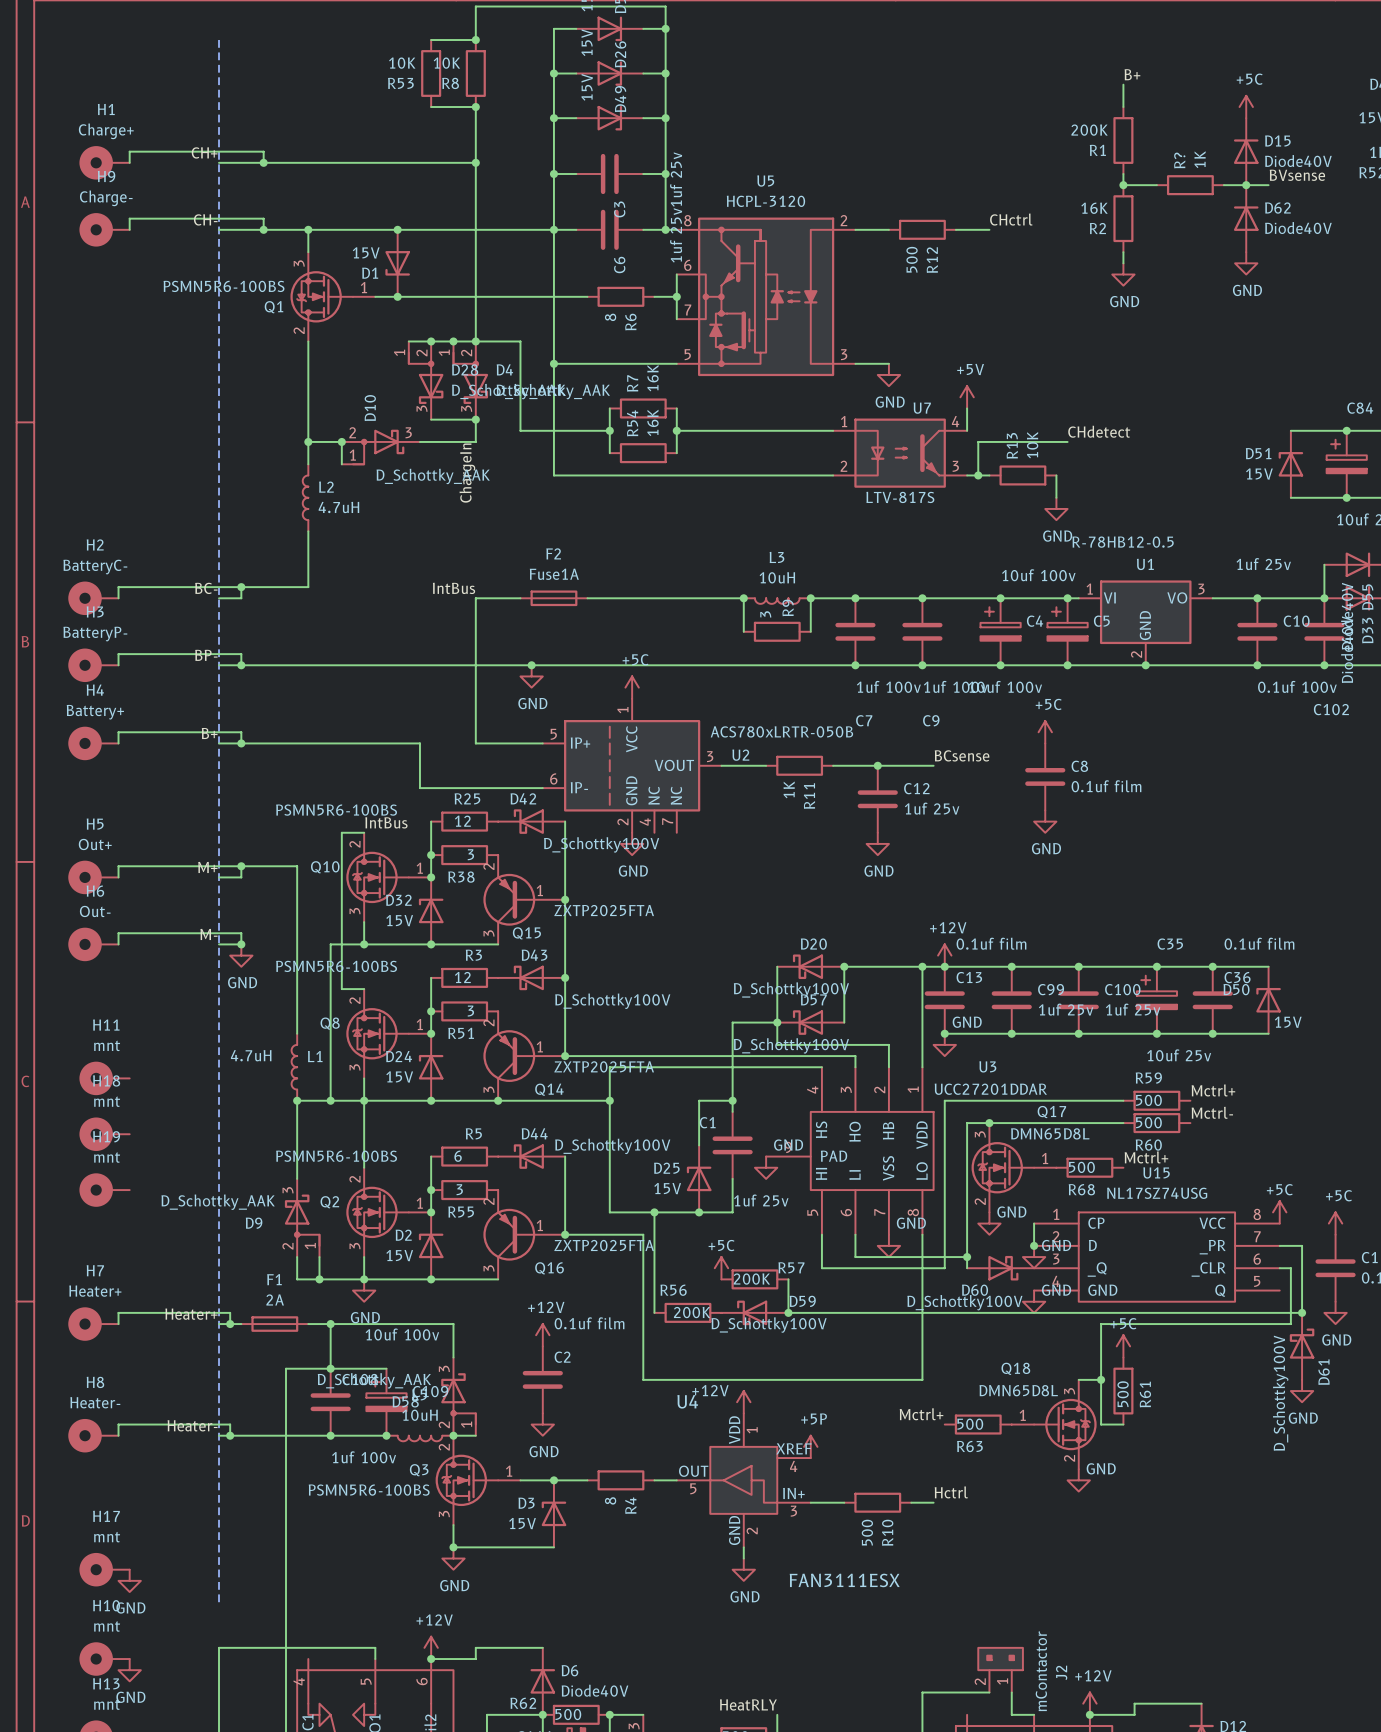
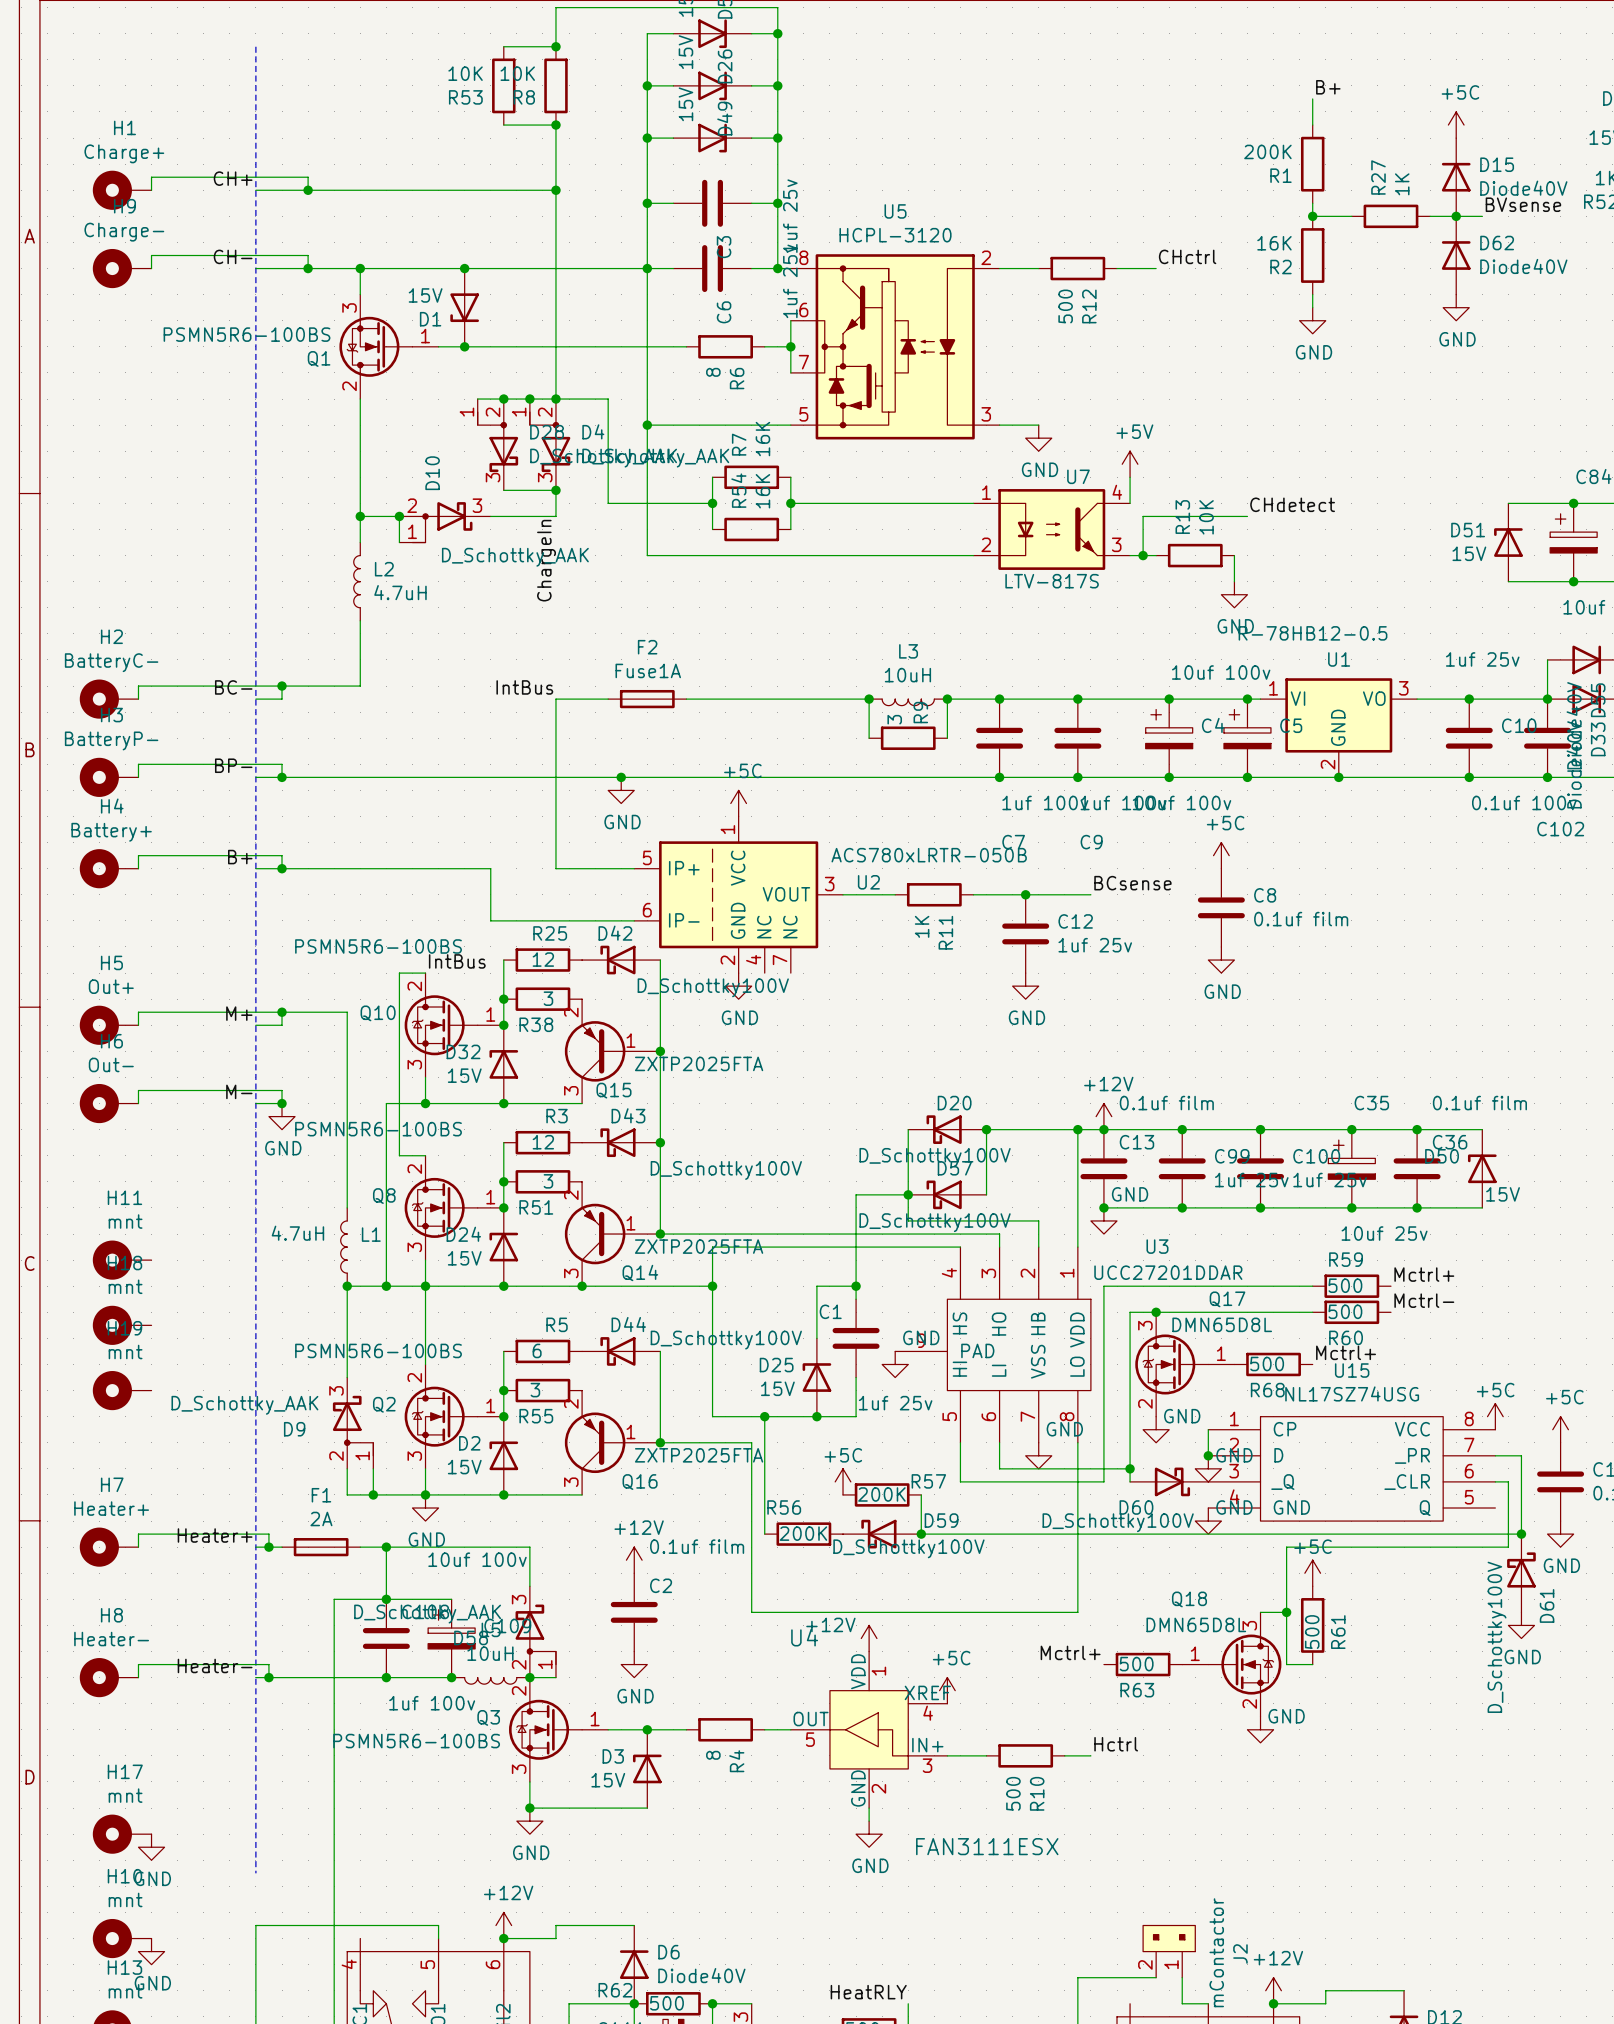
R? name: R? (1179, 160) -> R27 (1378, 177)
power symbol: +5P (810, 1446) -> +5C (947, 1690)

